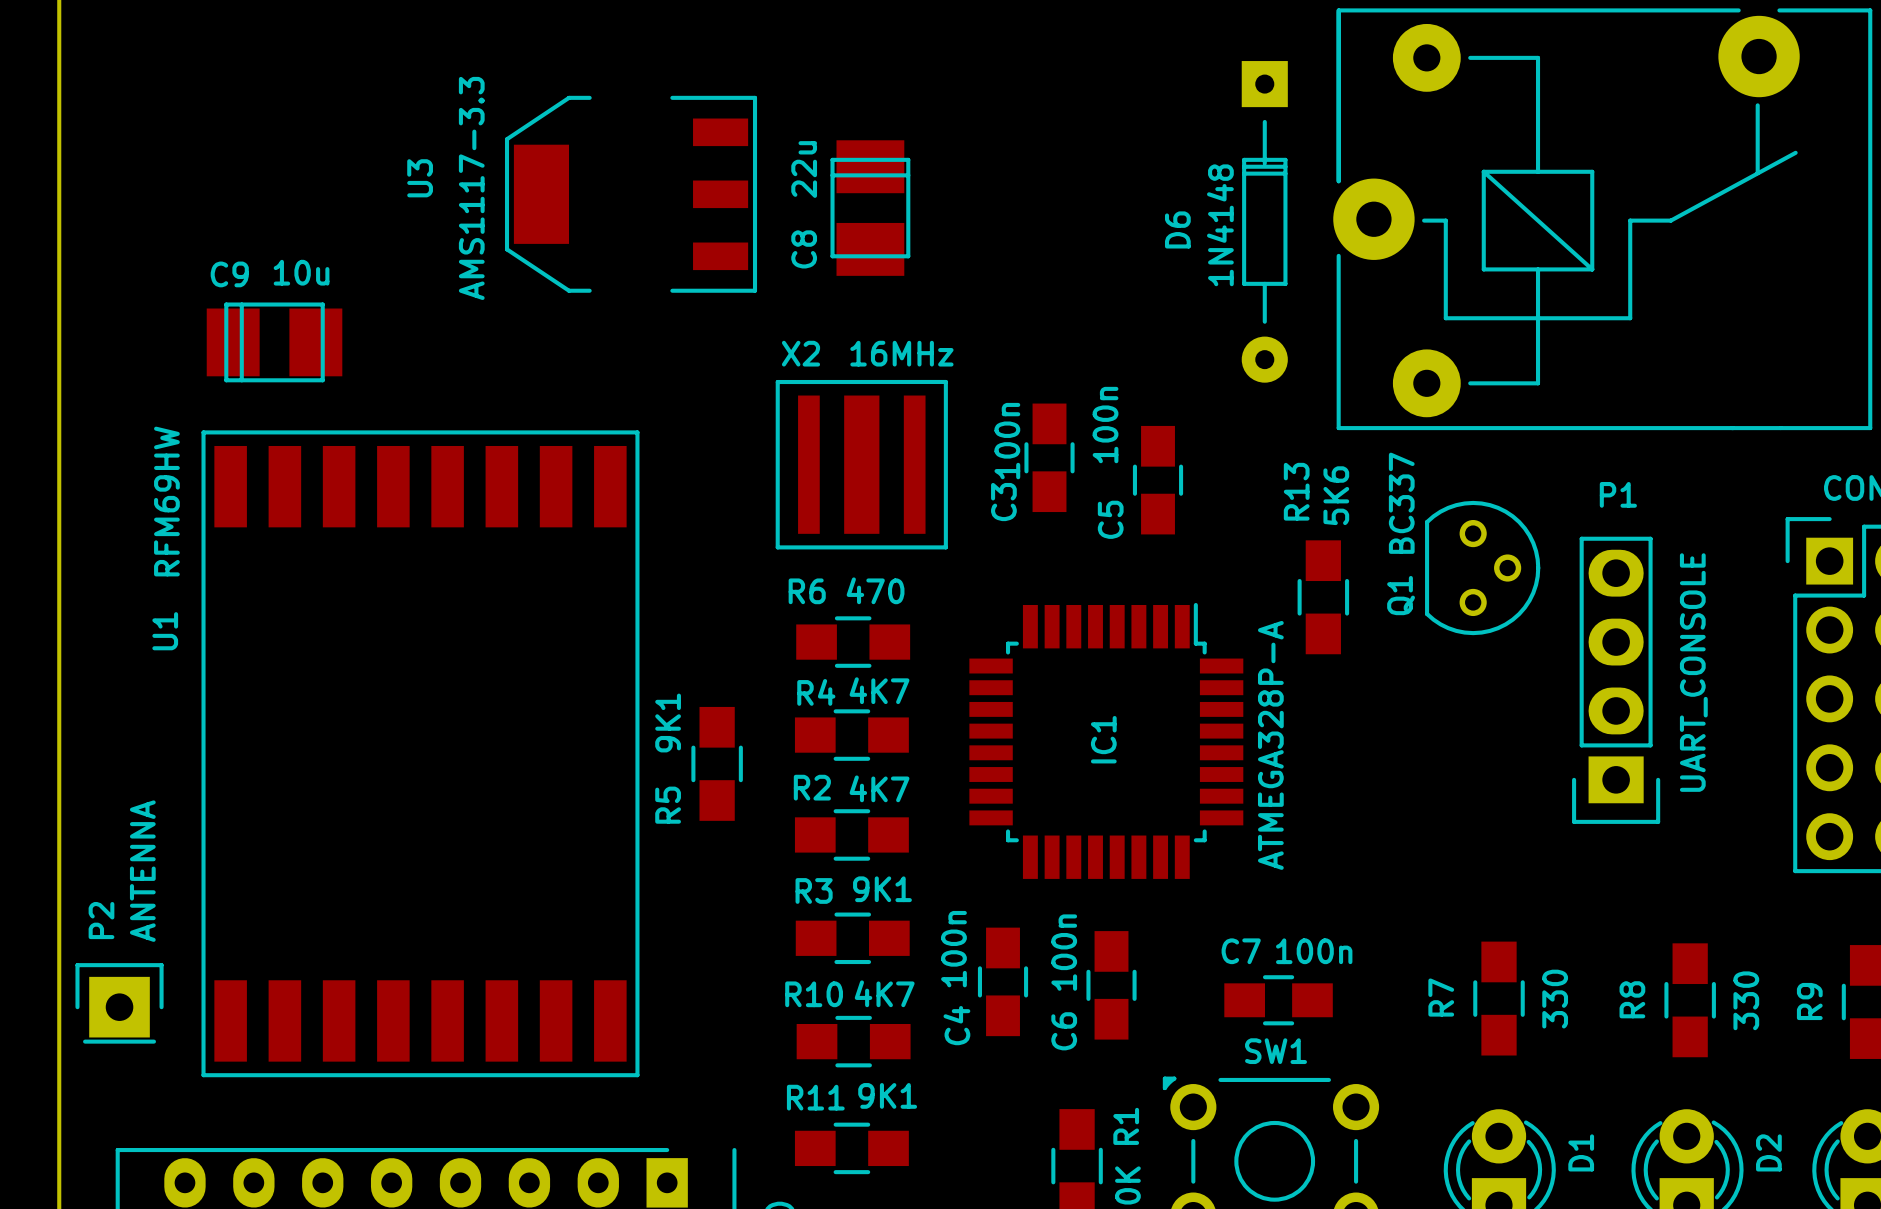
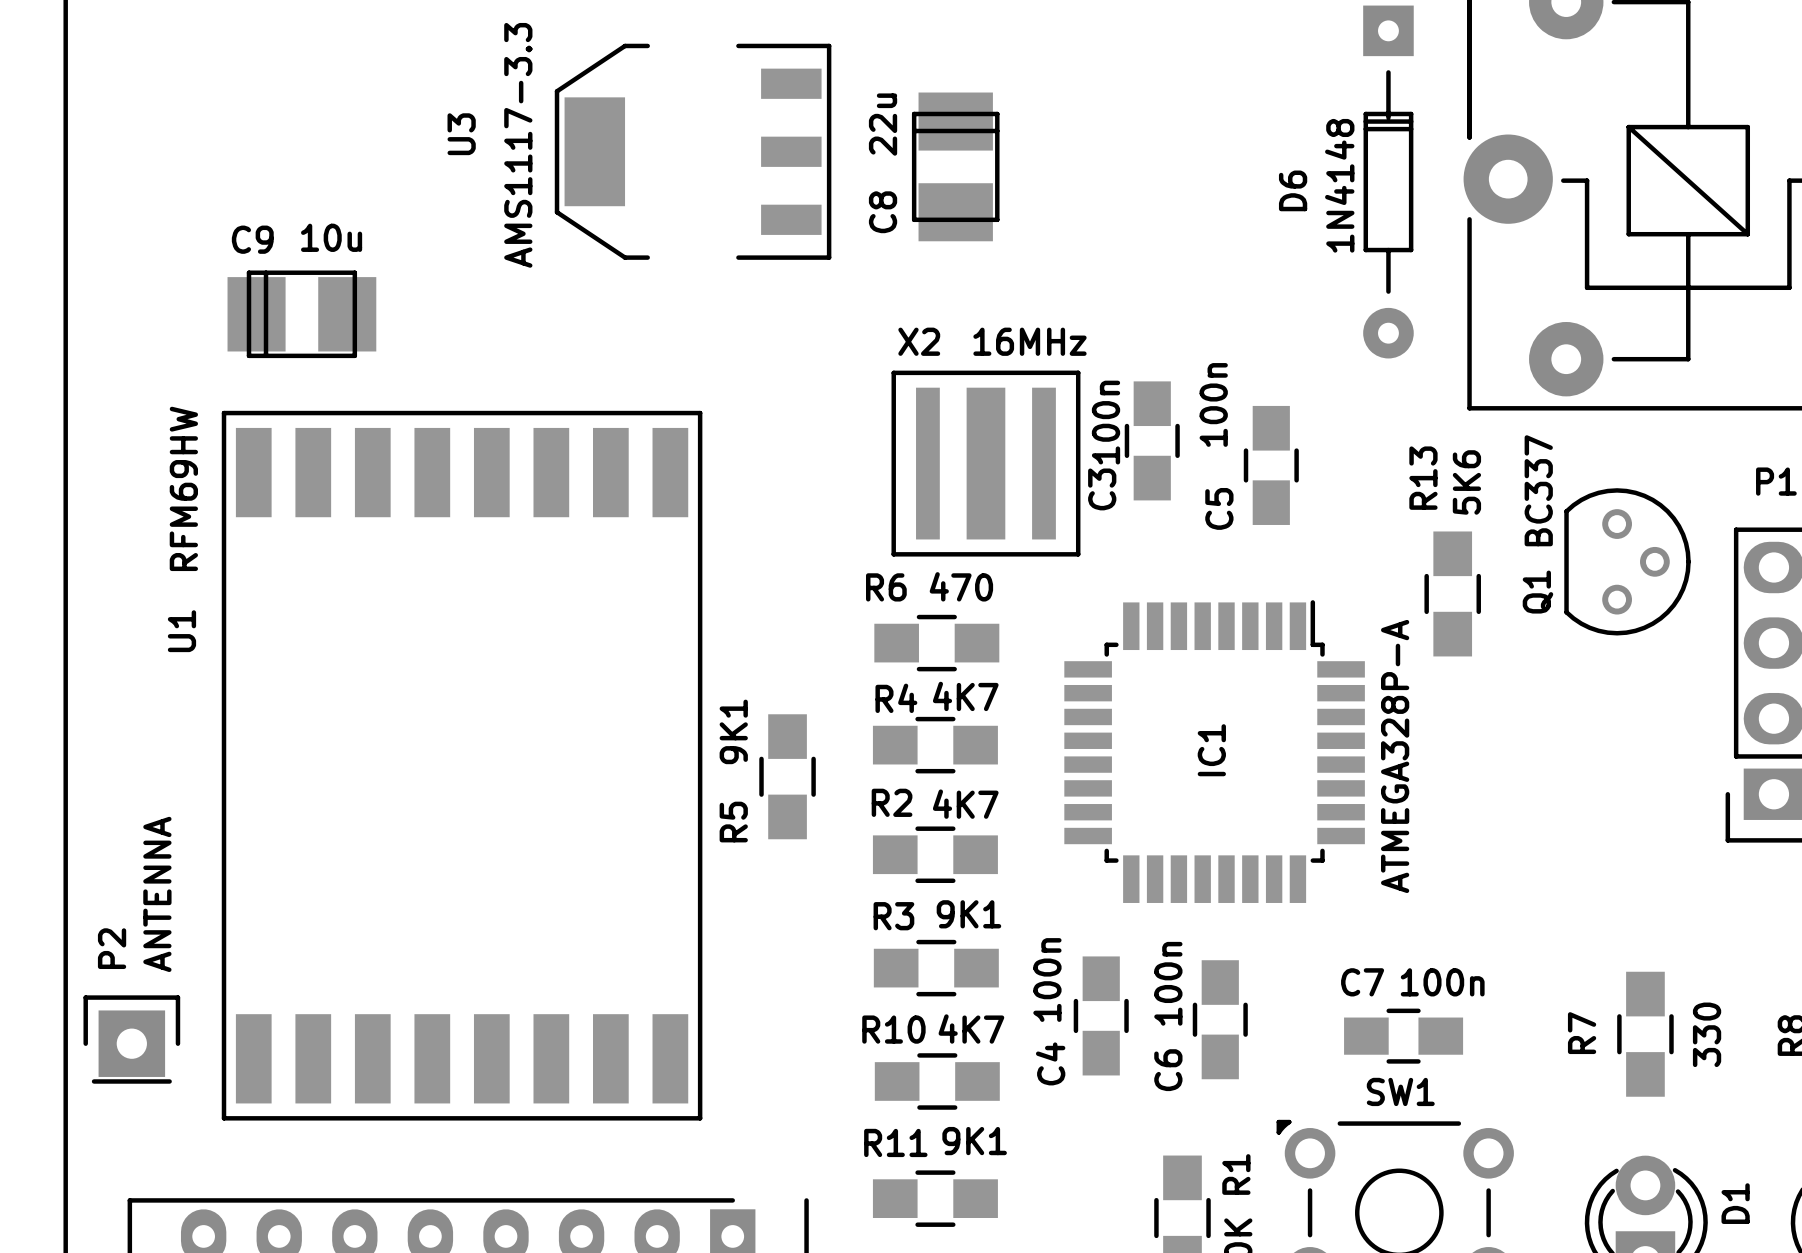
X2 position: (861, 464) -> (985, 463)

